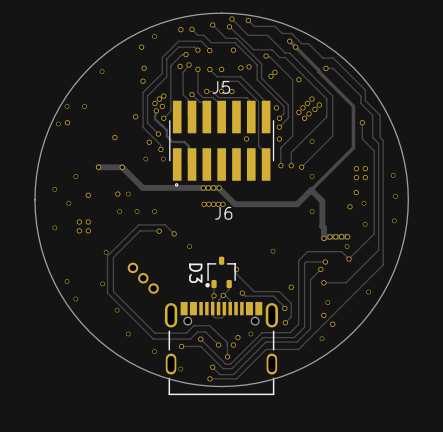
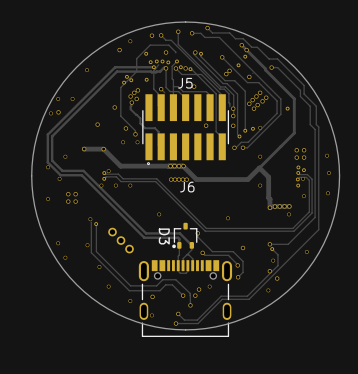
track: (231, 19) (248, 35) (267, 35) (285, 53) (289, 53) (332, 96) (332, 136) (301, 167) -> none
via: (231, 19) -> none
track: (212, 24) (226, 38) (236, 38) (261, 63) (261, 78) (288, 104) (288, 118) (279, 126) -> (178, 31) (178, 44) (220, 86) (225, 86) (233, 95) (233, 115)
track: (229, 26) (253, 49) (272, 49) (279, 57) (285, 57) (326, 99) (326, 116) (291, 152) (291, 165) -> (192, 33) (200, 33) (204, 37) (219, 37) (280, 98) (280, 114) (247, 147) (243, 147)
track: (203, 35) (211, 42) (234, 42) (257, 64) (257, 79) (283, 106) (283, 113) (279, 118) -> (170, 40) (220, 89) (224, 89) (228, 93) (229, 106)
track: (197, 50) (194, 47) (178, 47) (166, 59) (166, 76) (147, 96) (147, 123) (158, 134) -> none
via: (209, 50) -> none
via: none -> (146, 53)
track: none -> (193, 53) (223, 83) (226, 83) (237, 94) (237, 134) (239, 136)
track: none -> (201, 53) (201, 56) (225, 80) (234, 80) (245, 91) (245, 130)
via: none -> (201, 53)
track: (186, 54) (181, 54) (170, 65) (170, 111) (163, 118) -> none
via: (186, 54) -> none
via: none -> (245, 56)
track: (266, 56) (269, 56) (292, 79) (292, 136) (280, 147) (280, 165) -> (222, 58) (247, 82) (258, 82) (277, 100) (277, 113) (248, 142) (241, 142) (234, 147)
via: none -> (150, 62)
via: none -> (156, 61)
via: none -> (162, 61)
via: none -> (176, 61)
via: none -> (168, 62)
via: (189, 64) -> none
via: none -> (238, 65)
via: (180, 66) -> none
via: (249, 66) -> none
via: (240, 67) -> none
via: (144, 68) -> none
track: none -> (153, 67) (115, 67) (47, 134) (47, 162) (60, 175) (81, 175) (144, 237) (178, 237) (179, 245)
via: none -> (153, 67)
track: none -> (164, 67) (160, 71) (155, 72) (117, 71) (52, 136) (52, 160) (62, 170) (83, 170) (146, 233) (179, 233) (191, 245)
via: none -> (180, 67)
via: none -> (190, 69)
via: none -> (126, 76)
via: (143, 81) -> none
via: none -> (131, 80)
via: none -> (146, 79)
via: none -> (124, 82)
via: (206, 91) -> none
track: (221, 91) (221, 84) (224, 81) (238, 81) (258, 101) -> (190, 69) (216, 95)
via: (221, 91) -> none
track: (196, 99) (206, 106) -> (176, 61) (172, 66) (173, 98)
via: (276, 107) -> none
via: (163, 118) -> none
via: none -> (287, 108)
track: (362, 122) (362, 139) (374, 150) (374, 233) (349, 259) (341, 251) (307, 251) (298, 260) (298, 324) (290, 332) (262, 332) (230, 364) (225, 364) (200, 339) -> none
via: (362, 122) -> none
via: (158, 134) -> none
via: none -> (252, 128)
via: none -> (245, 130)
via: none -> (239, 136)
via: (301, 167) -> none
via: none -> (298, 167)
via: (356, 192) -> none
via: none -> (303, 170)
via: (117, 194) -> none
via: (88, 195) -> none
track: none -> (104, 173) (118, 174) (123, 178) (156, 178) (206, 228) (292, 228) (309, 211) (309, 180) (306, 177) (299, 177) (297, 179)
via: none -> (104, 173)
track: none -> (298, 172) (307, 174) (312, 179) (312, 213) (293, 231) (205, 231) (155, 181) (121, 181) (116, 176) (106, 176) (104, 178)
via: none -> (298, 172)
via: none -> (104, 178)
via: none -> (297, 179)
via: (349, 206) -> none
via: none -> (298, 185)
track: (159, 231) (140, 230) (113, 257) -> none
via: (159, 231) -> none
track: (174, 233) (165, 224) (138, 224) (107, 256) (107, 293) -> (91, 222) (91, 252)
via: (174, 233) -> none
via: none -> (96, 224)
via: (349, 259) -> none
track: (325, 262) (304, 263) (304, 327) (294, 337) (263, 337) (231, 368) (223, 368) (200, 346) (181, 346) -> none
via: (325, 262) -> none
track: (320, 269) (310, 279) (310, 328) (297, 342) (266, 342) (233, 374) -> (272, 249) (277, 254) (277, 265) (247, 296) (221, 296) (195, 320)
via: (320, 269) -> none
via: none -> (272, 249)
via: (214, 295) -> none
via: (223, 295) -> none
via: (200, 339) -> none

